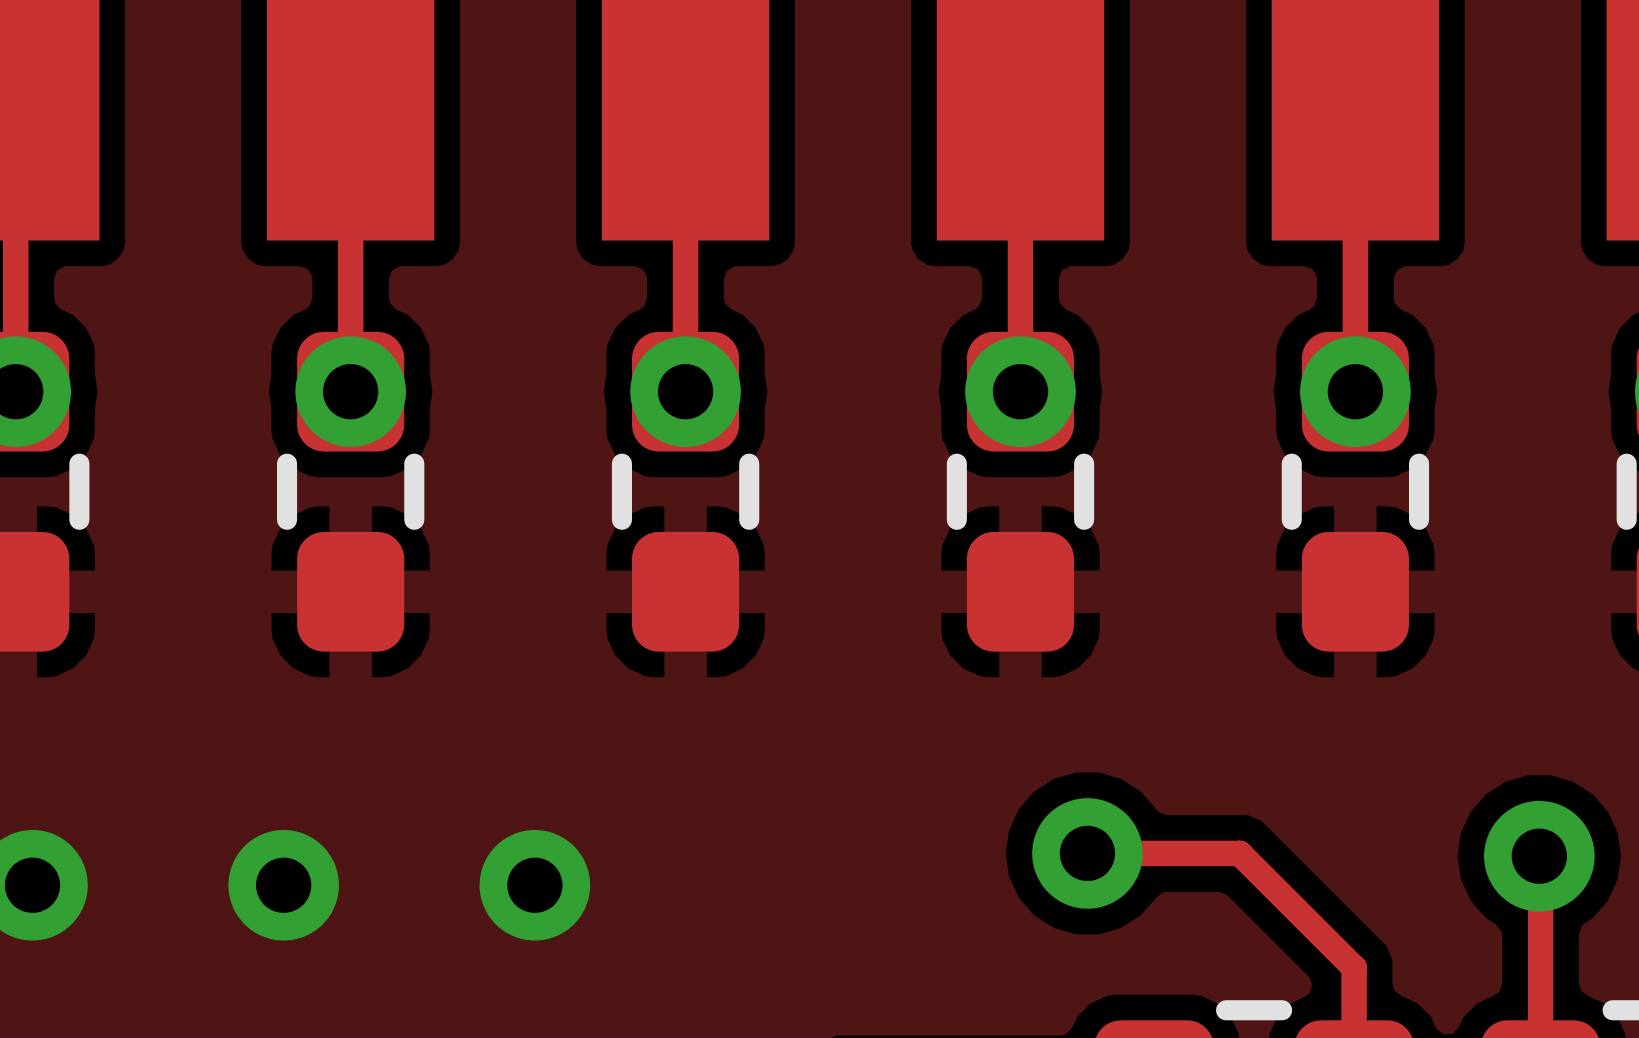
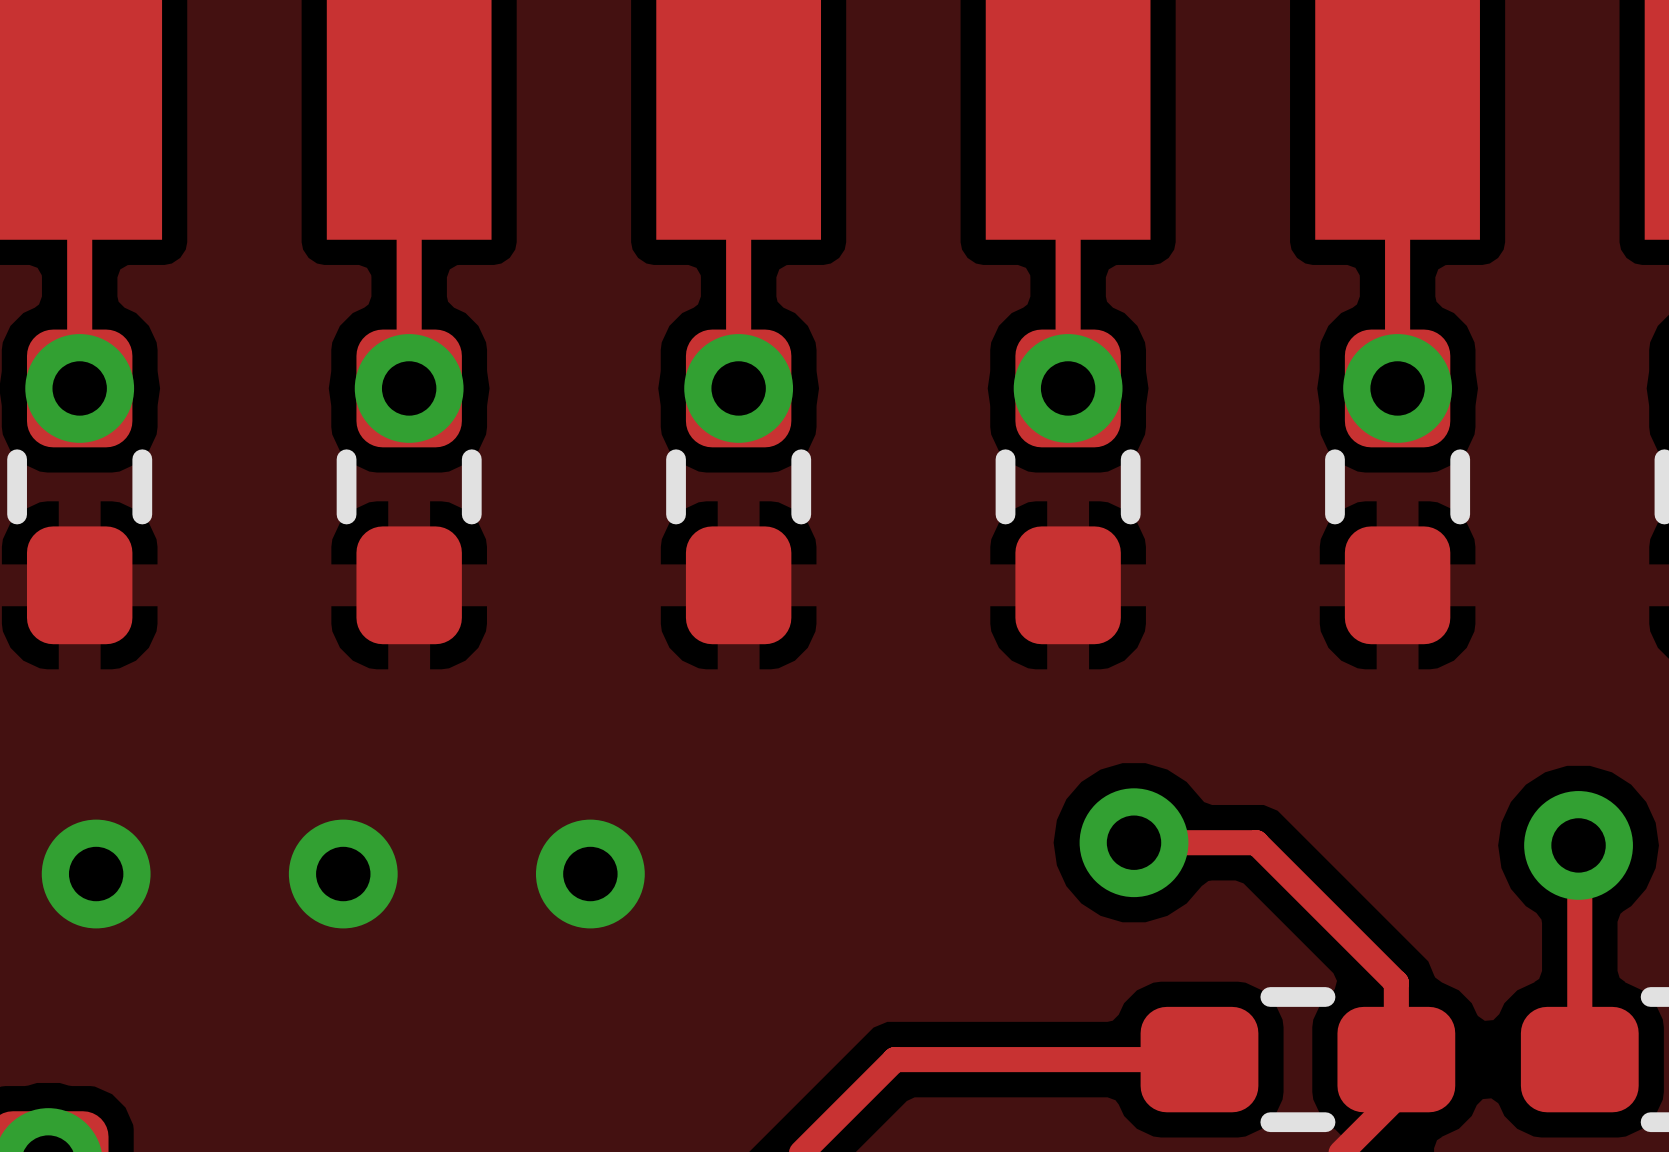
track: (1211, 853) (1239, 853) (1354, 967) (1354, 995) -> (1256, 842) (1396, 982)

